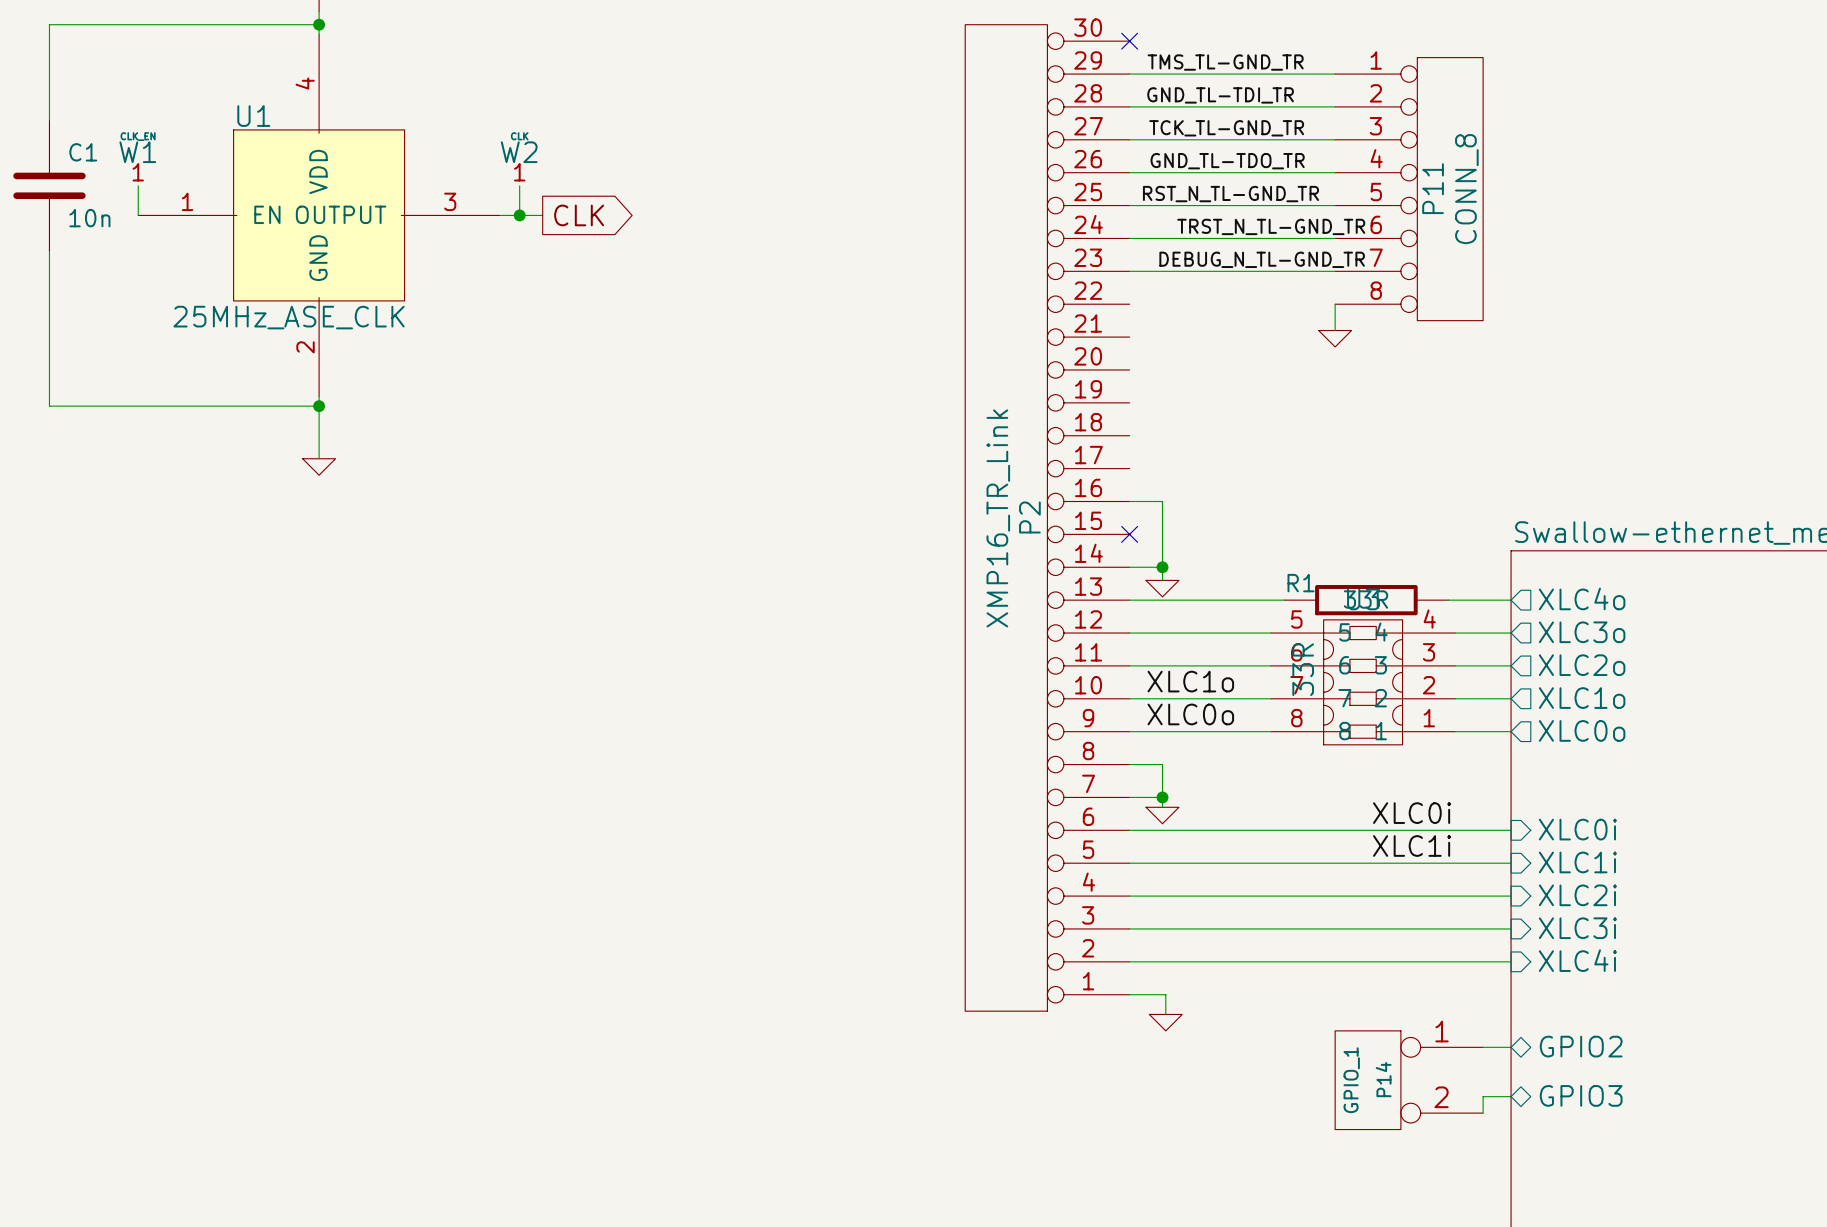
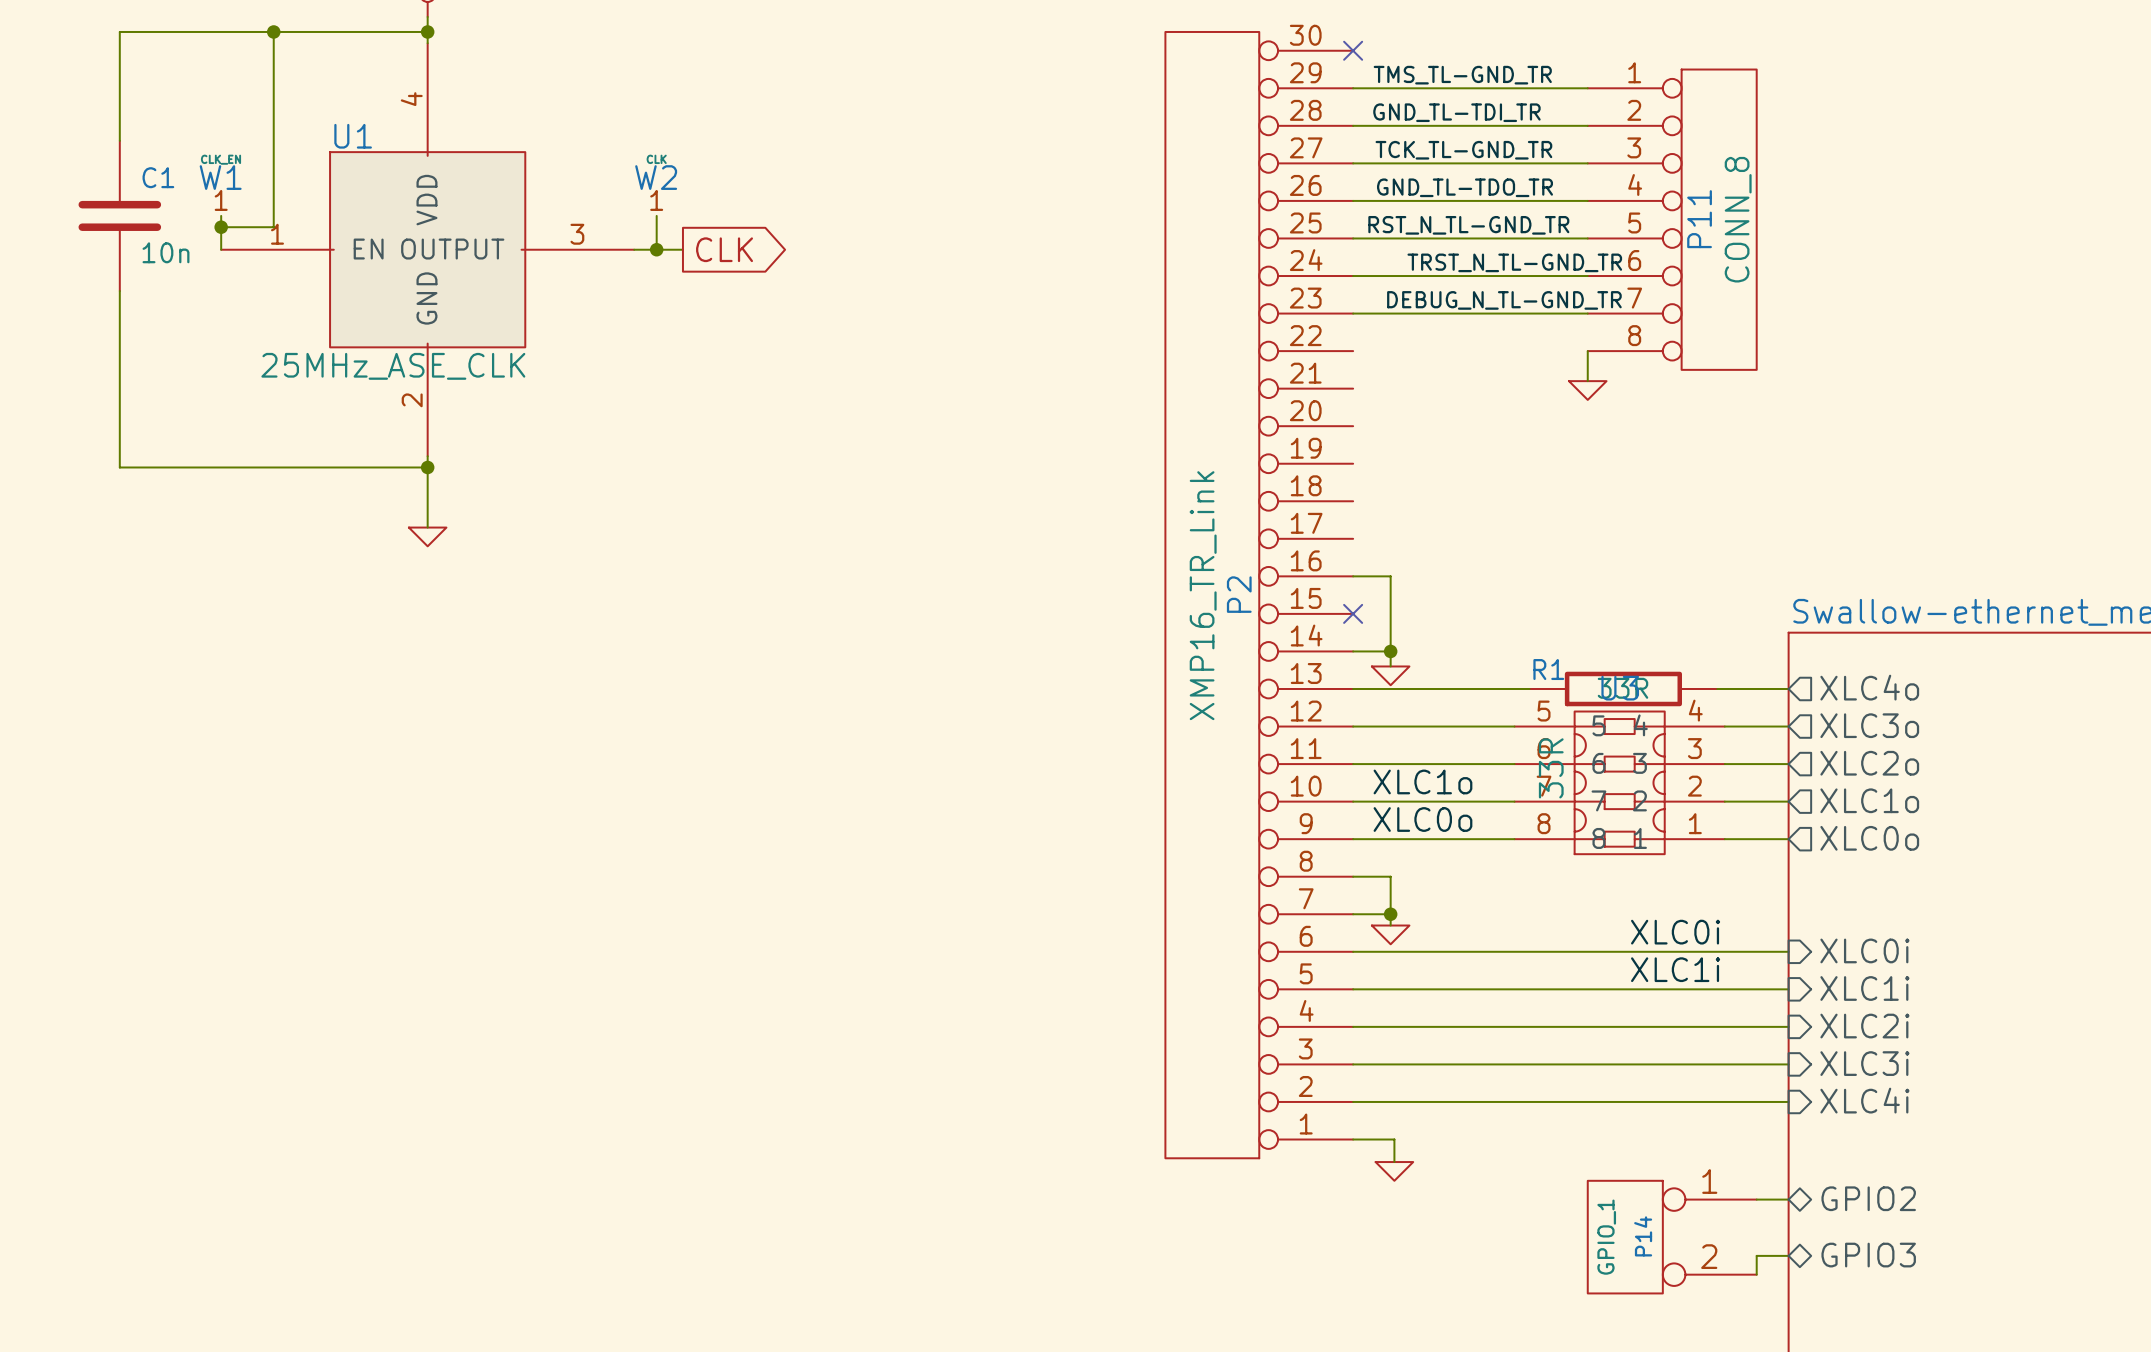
wire: none -> (273, 31) (273, 227) (221, 227)
junction: none -> (273, 31)
junction: none -> (221, 227)

